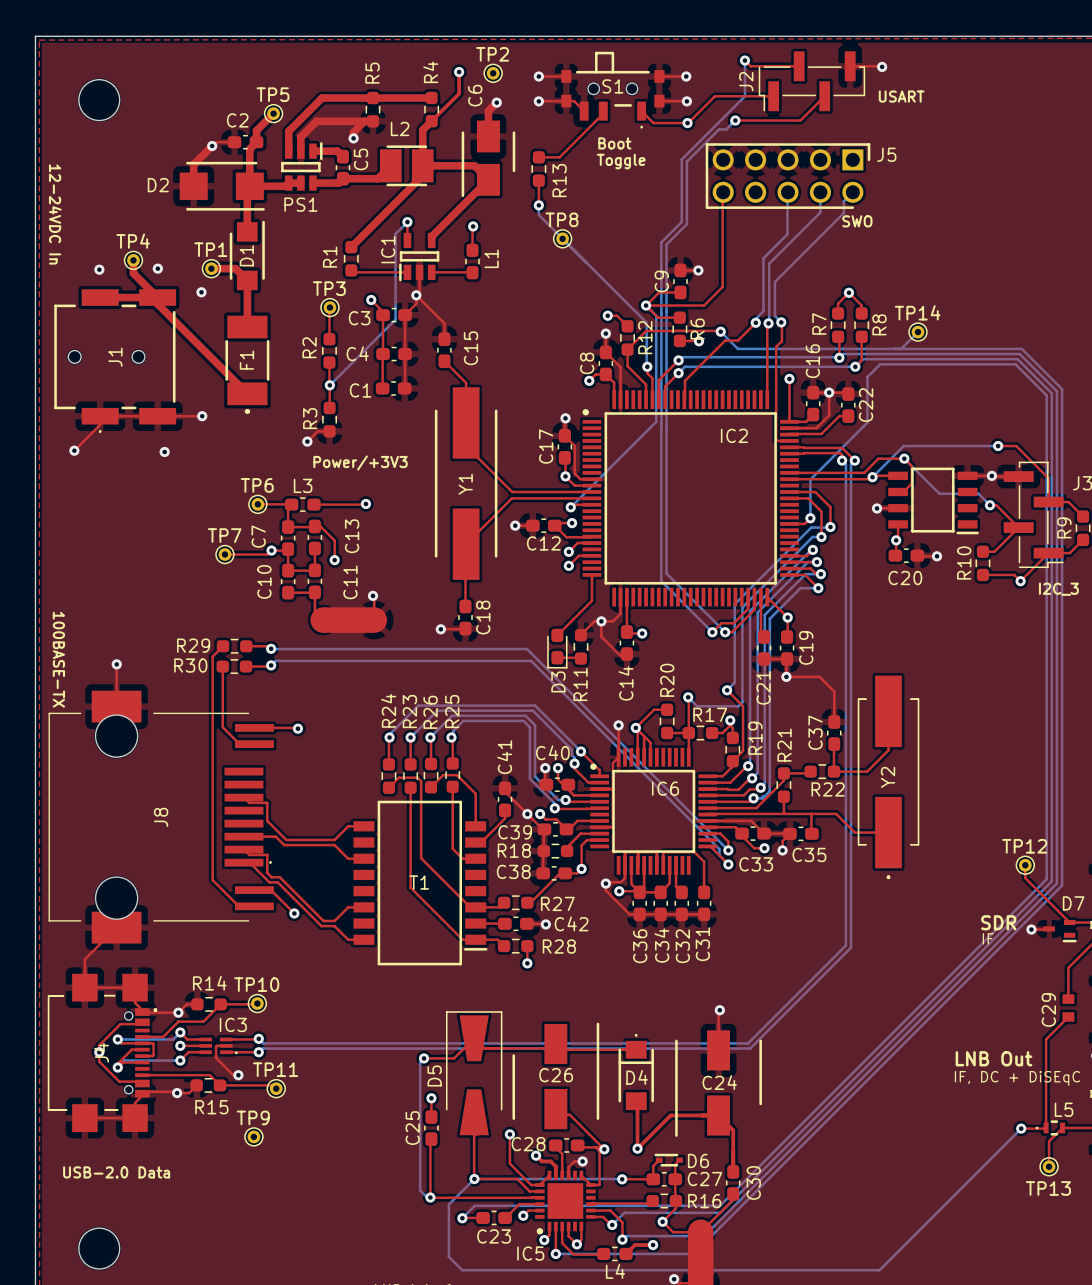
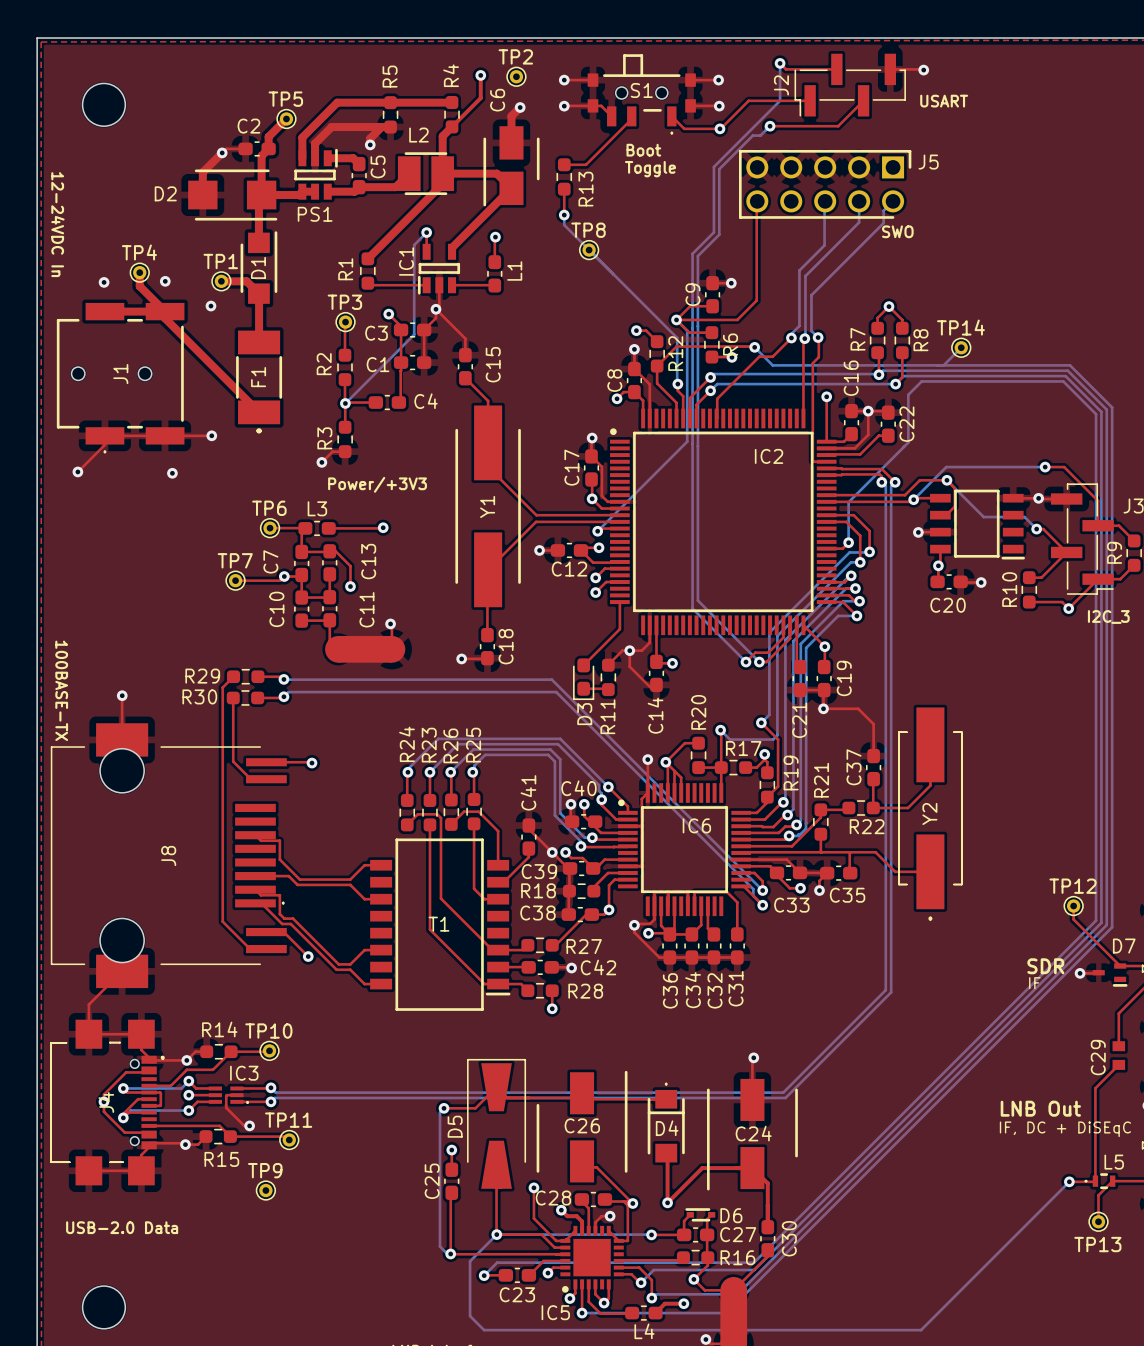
top track: (405, 346) (404, 388) -> none
C4 name position: C4 (357, 353) -> C4 (426, 401)
C4 position: (394, 354) -> (387, 402)
top track: none -> (375, 402) (345, 403)
C1 position: (393, 388) -> (412, 362)

